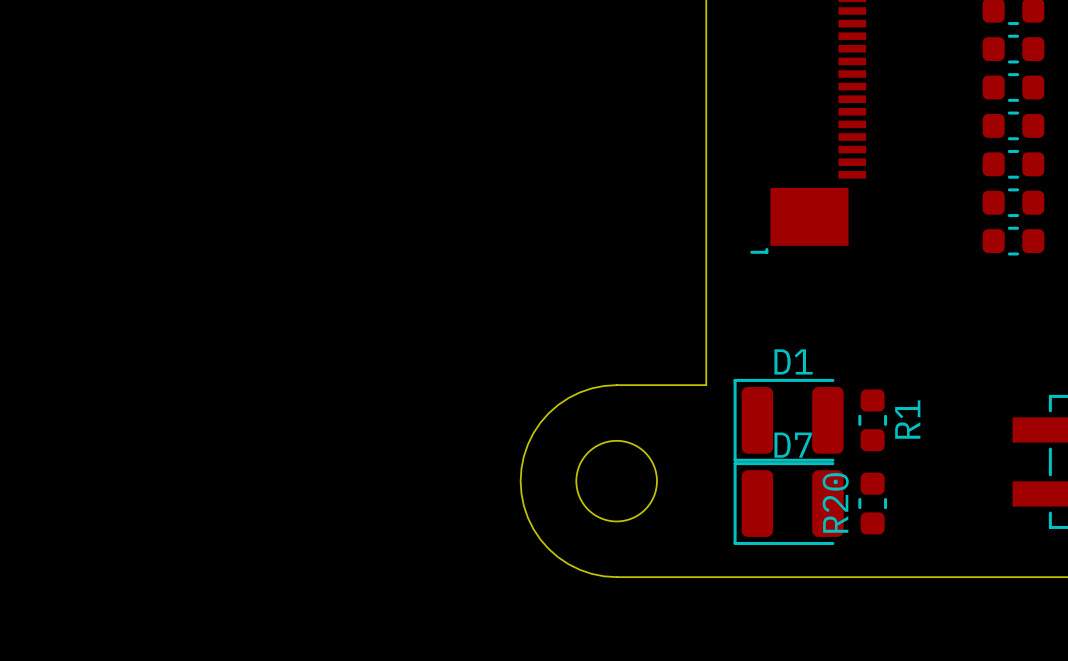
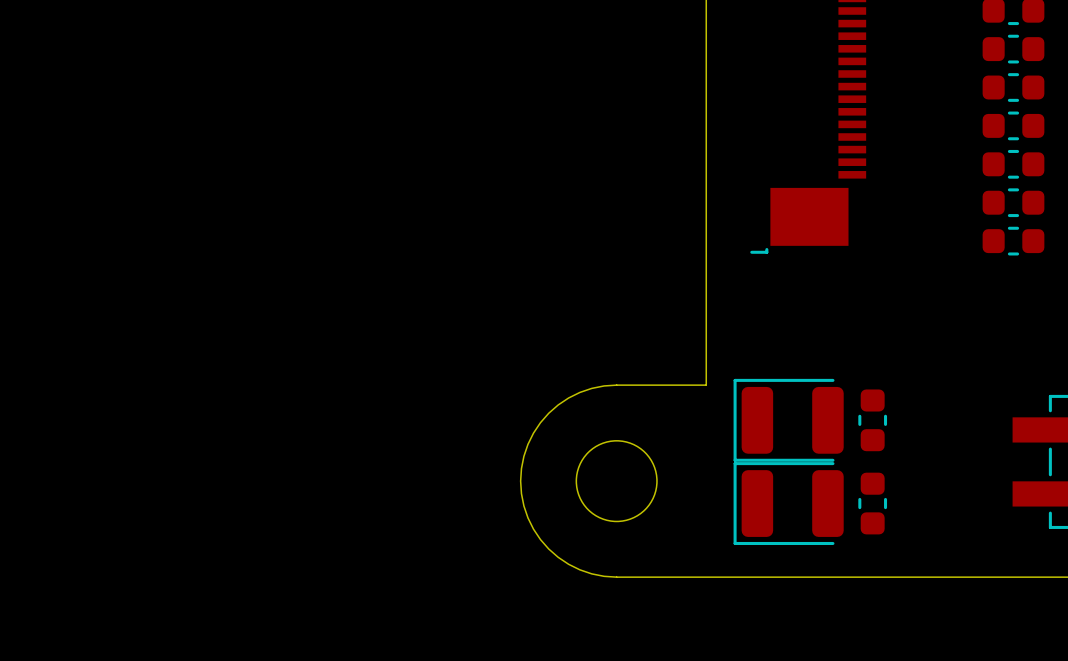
D1 name: D1 (793, 361) -> none
R1 name: R1 (907, 419) -> none
D7 name: D7 (793, 445) -> none
R20 name: R20 (835, 502) -> none

